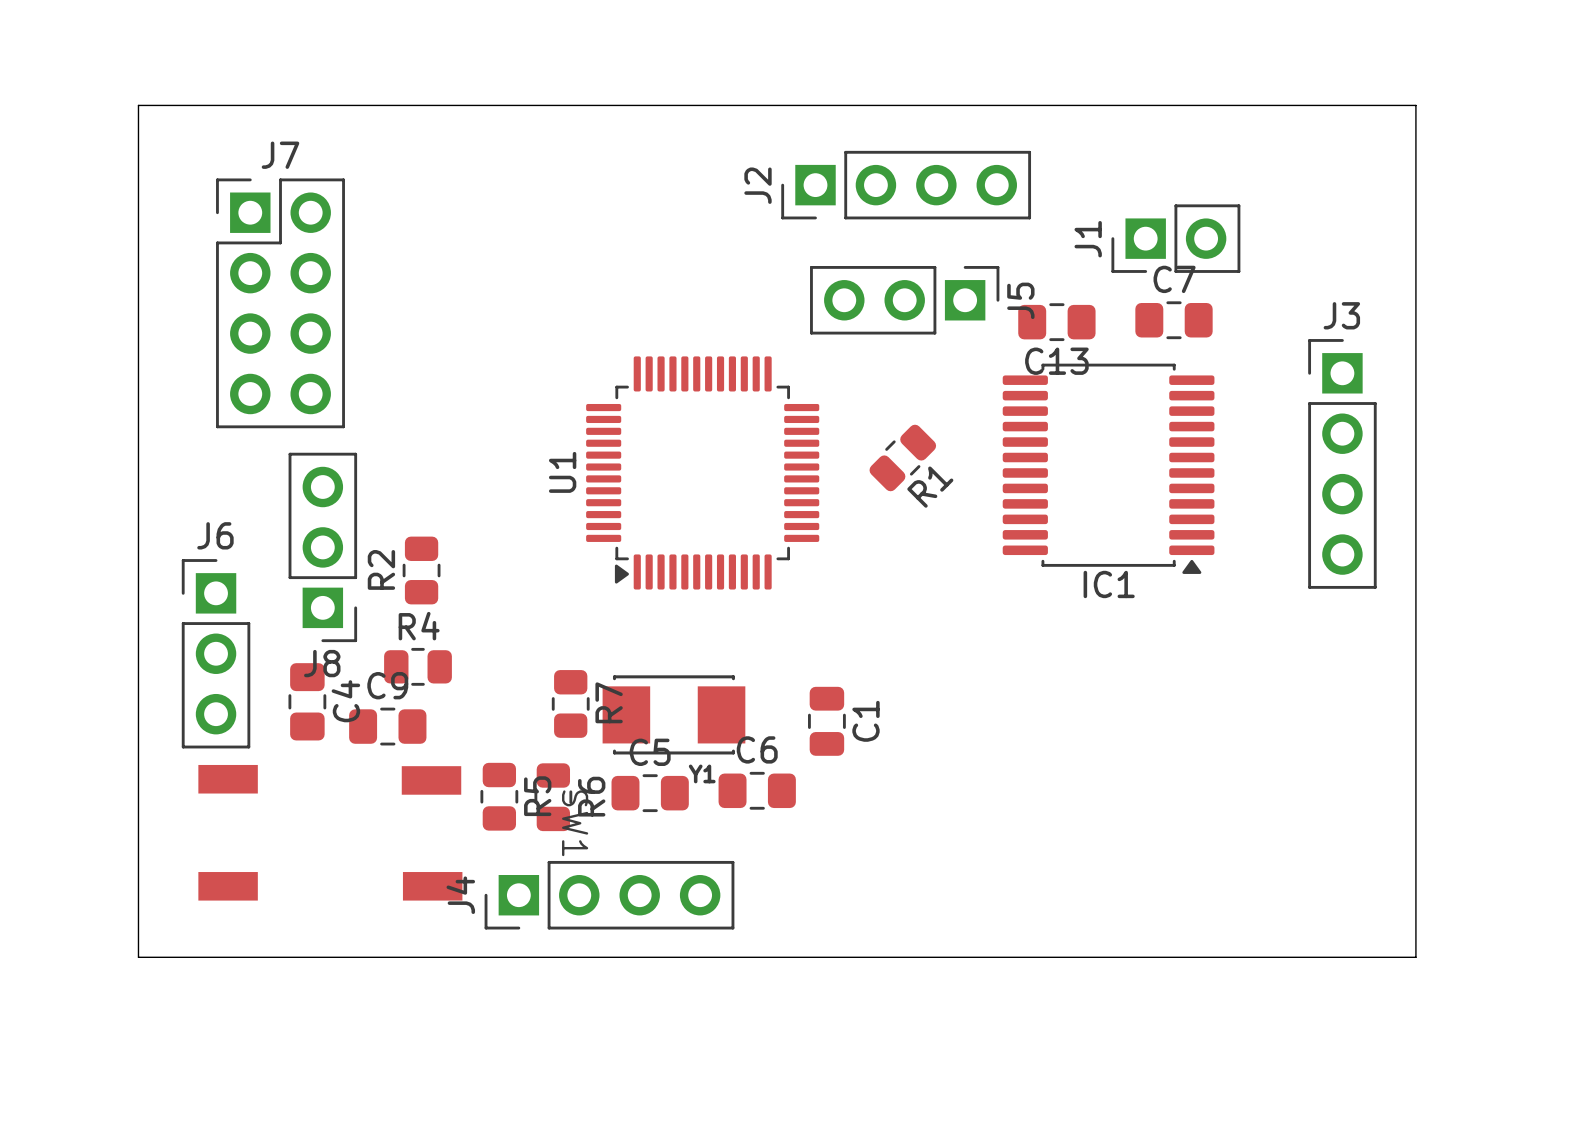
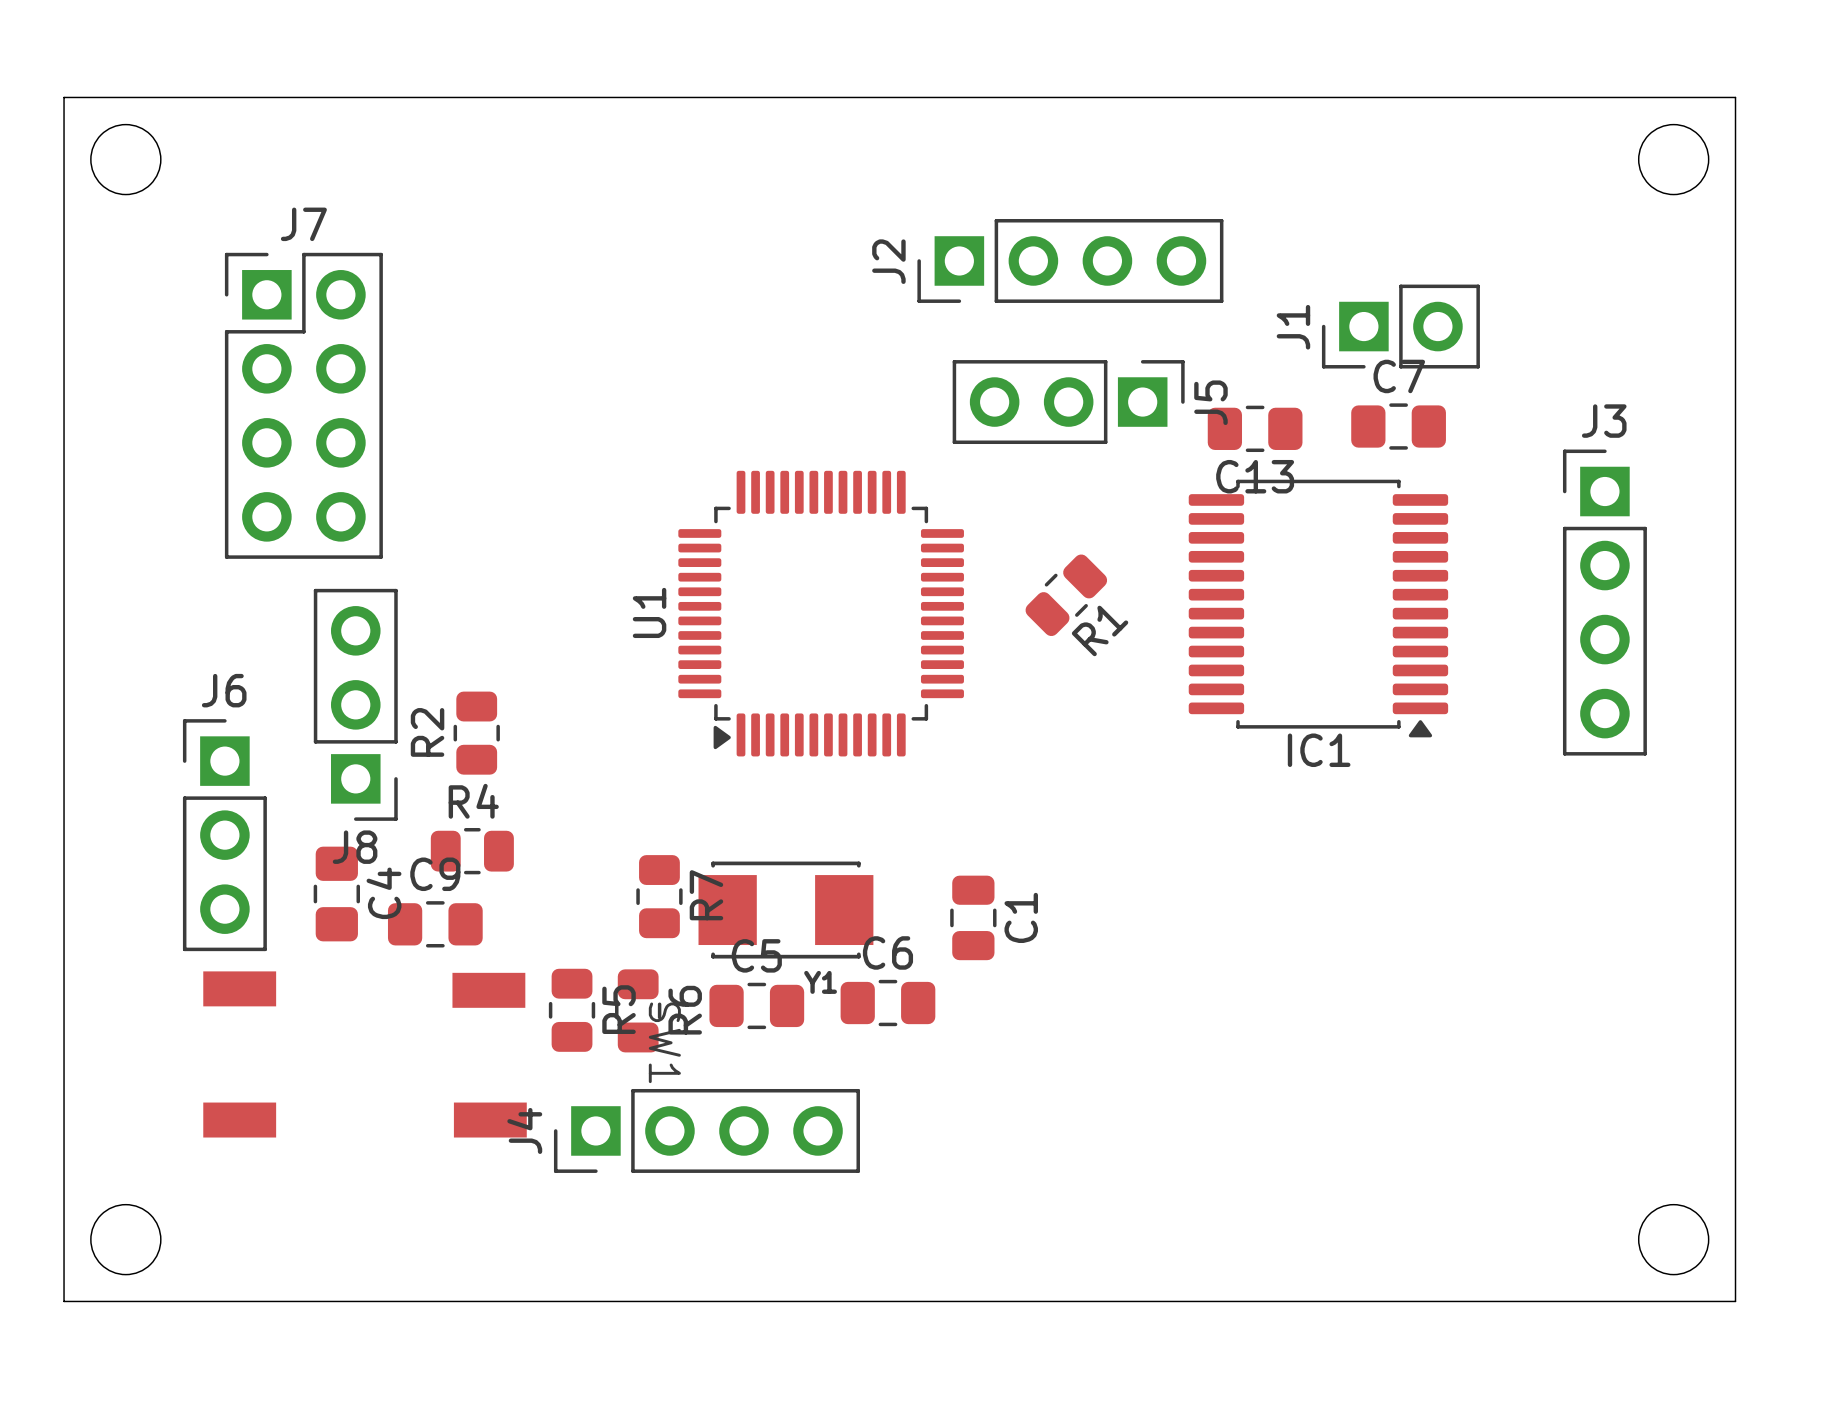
round board edge: none -> [90, 123, 162, 196]
round board edge: none -> [1637, 123, 1710, 196]
board edge: (138, 105) (1415, 105) (1415, 957) (138, 957) (138, 105) -> (64, 97) (64, 1301) (1735, 1301) (1735, 97) (64, 97)
round board edge: none -> [90, 1203, 162, 1276]
round board edge: none -> [1637, 1203, 1710, 1276]

